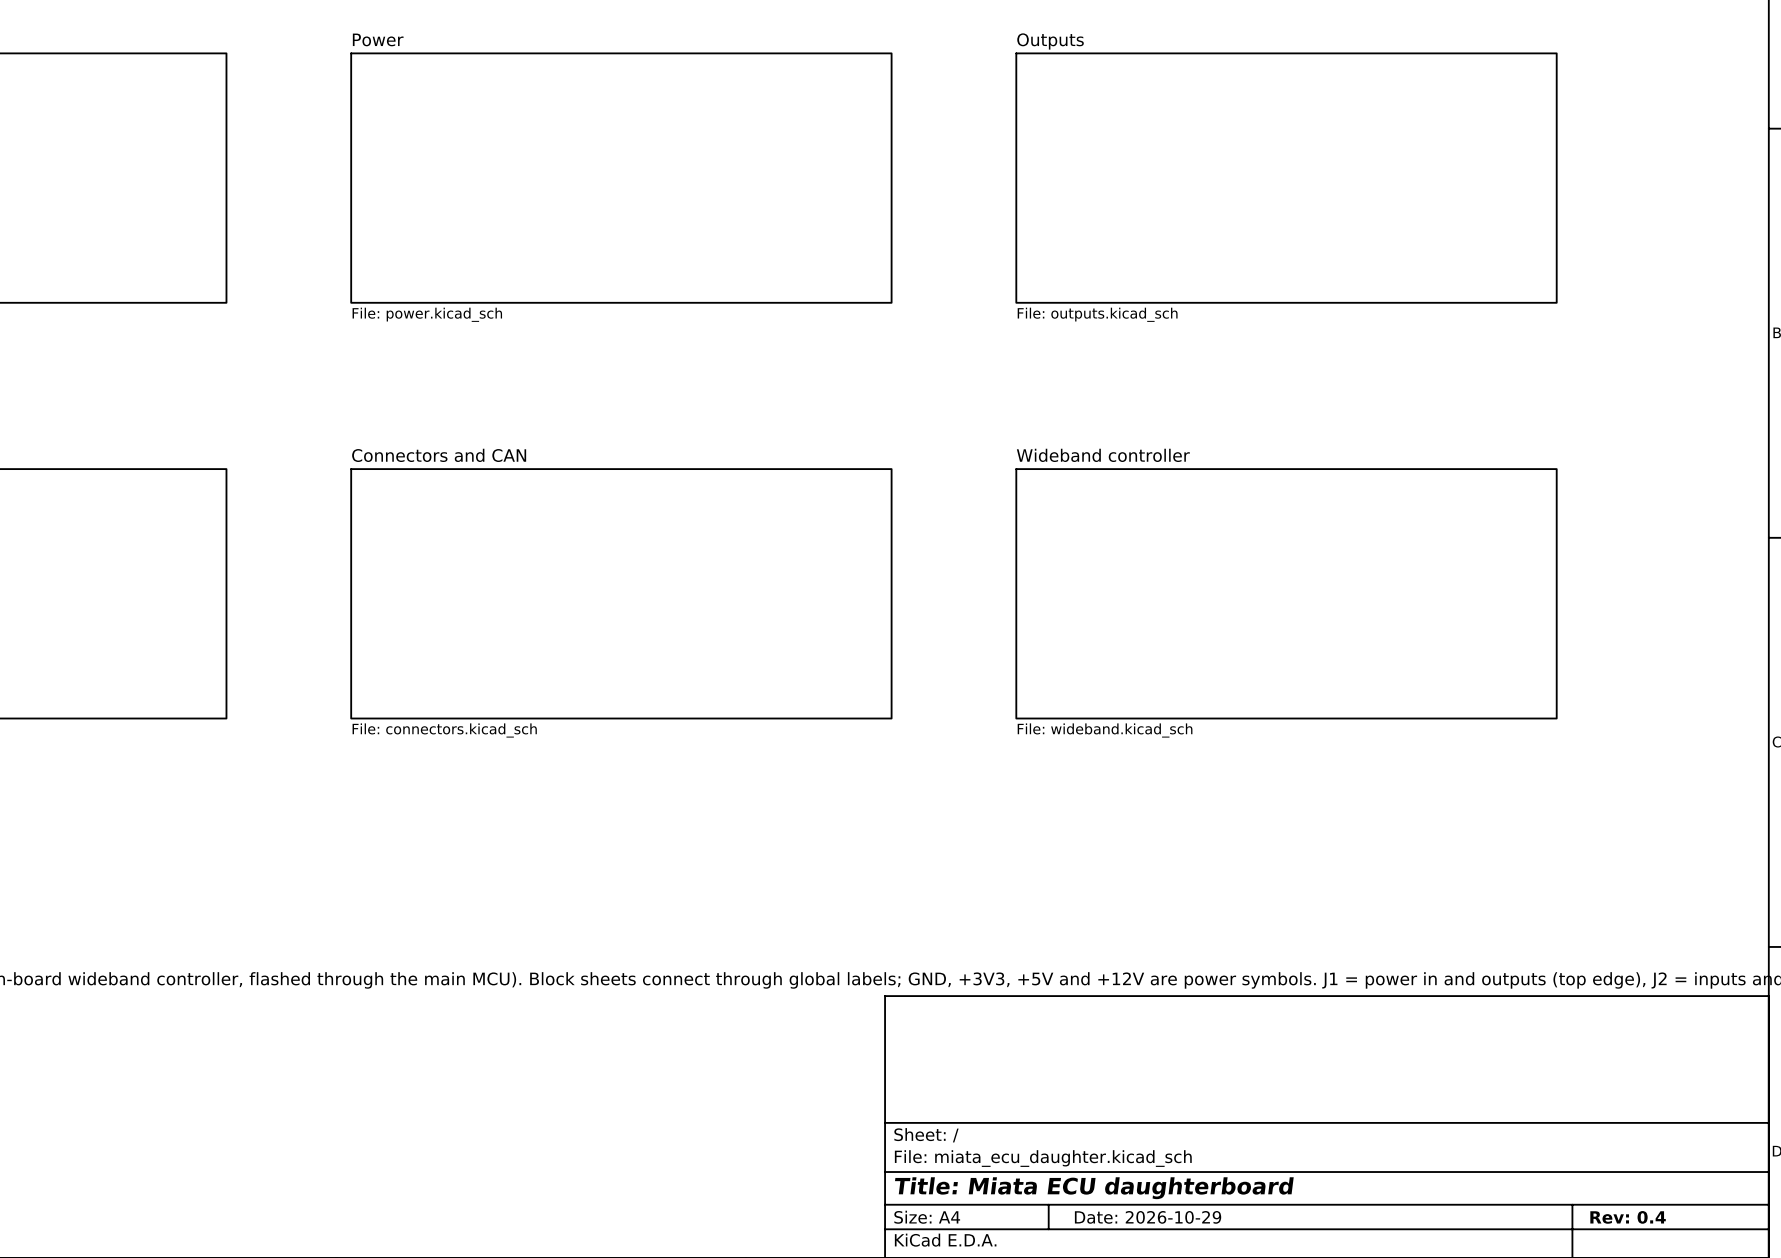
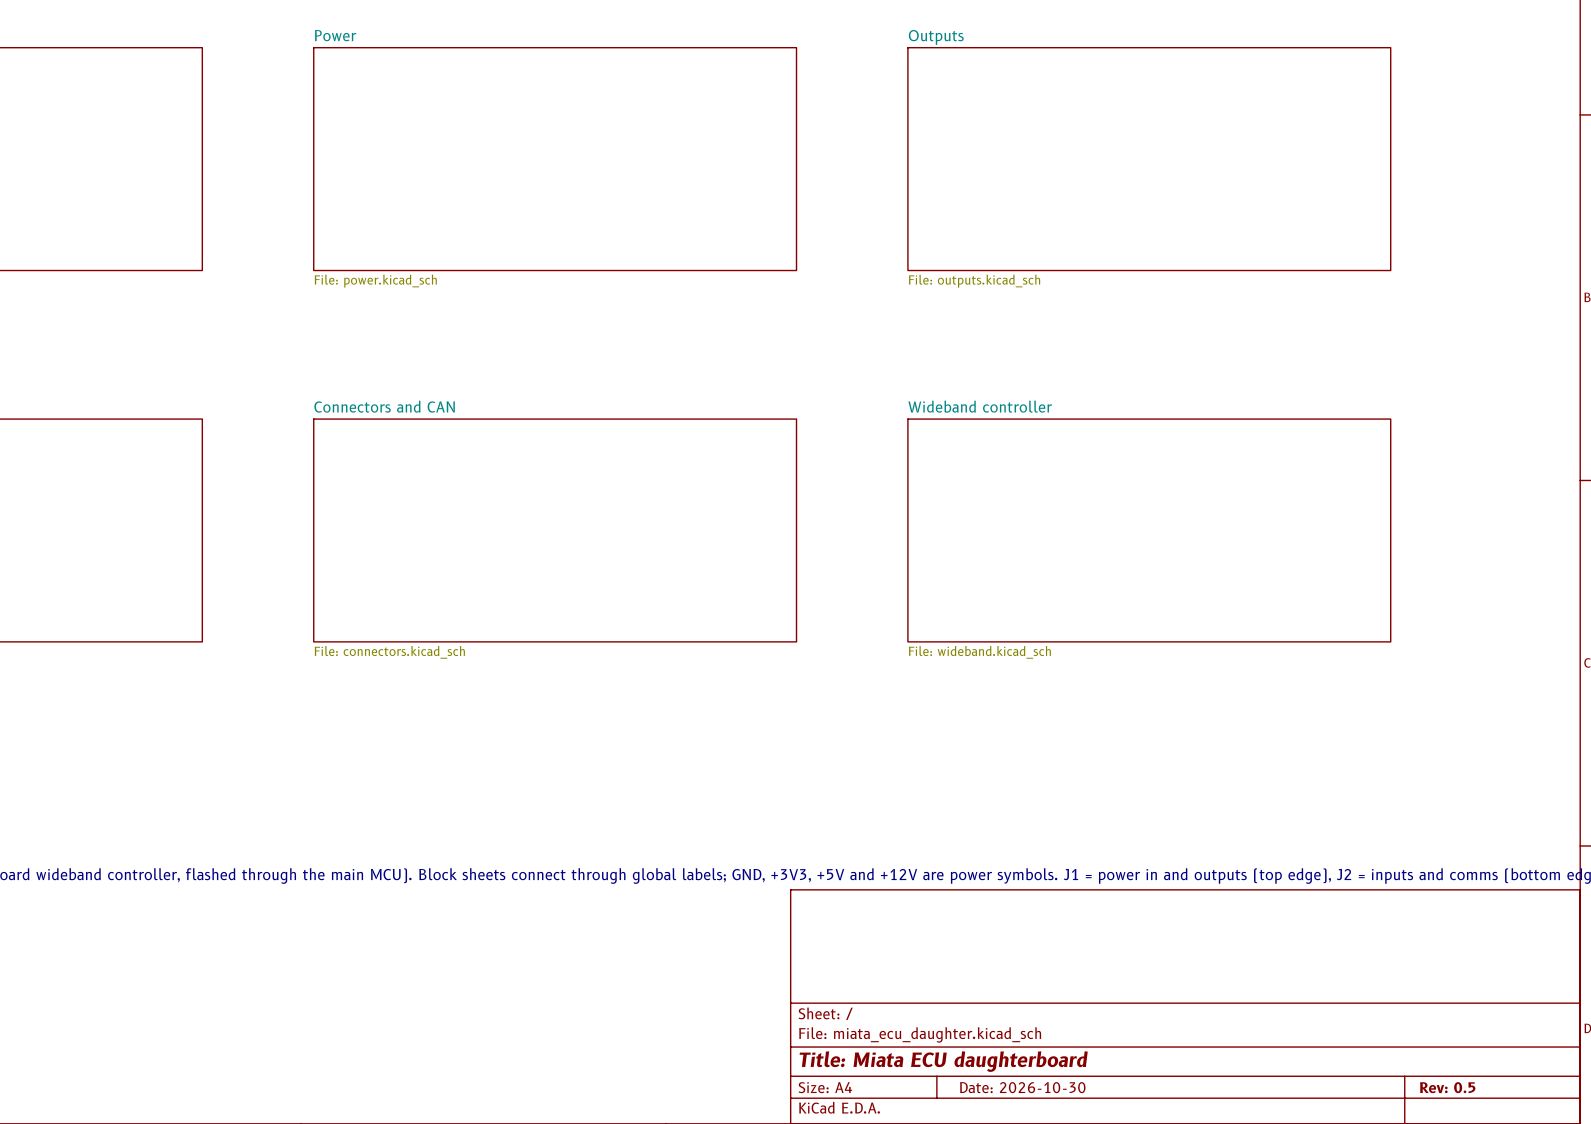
title block: Date: 2026-10-29 (1148, 1217) -> Date: 2026-10-30 (1022, 1087)
title block: Rev: 0.4 (1628, 1217) -> Rev: 0.5 (1447, 1087)

